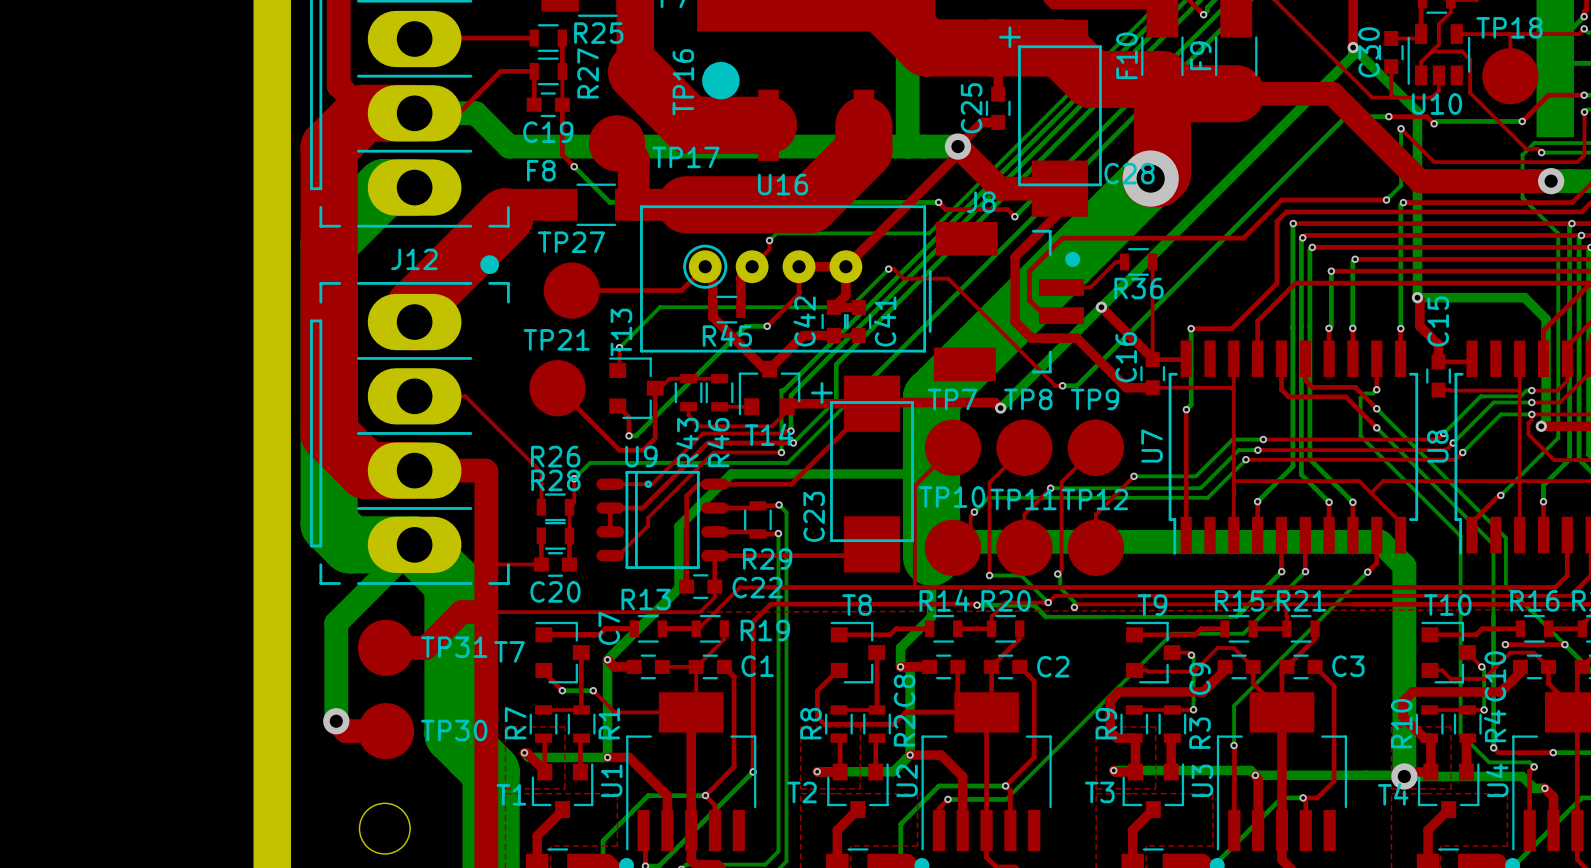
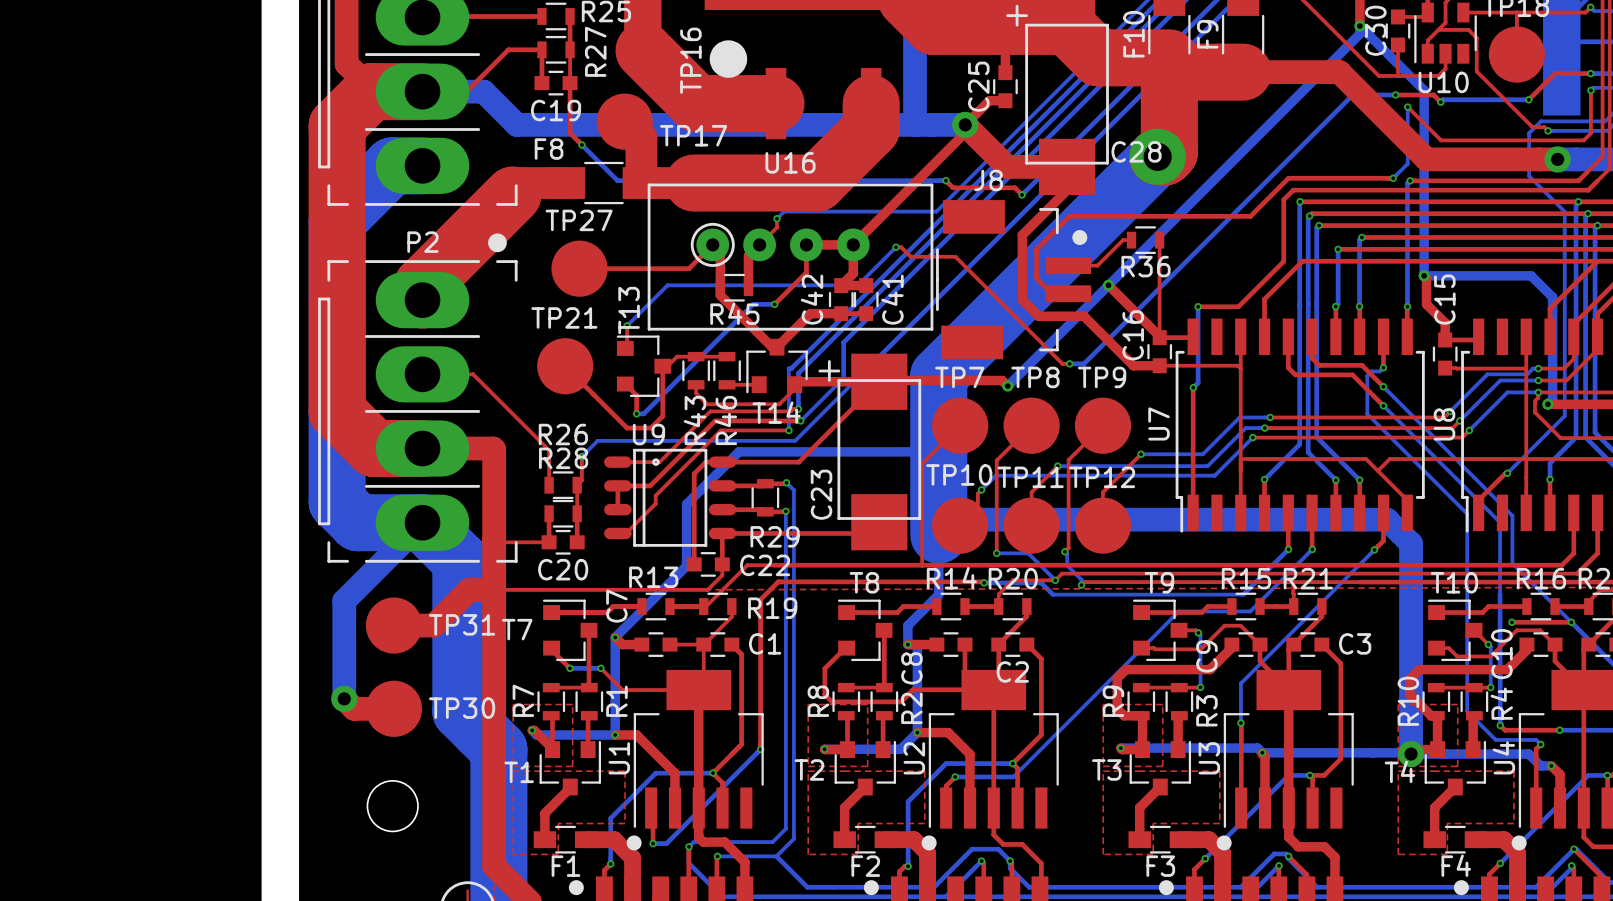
J12 name: J12 (414, 259) -> P2 (422, 242)
C2 name position: C2 (1053, 666) -> C2 (1012, 671)

